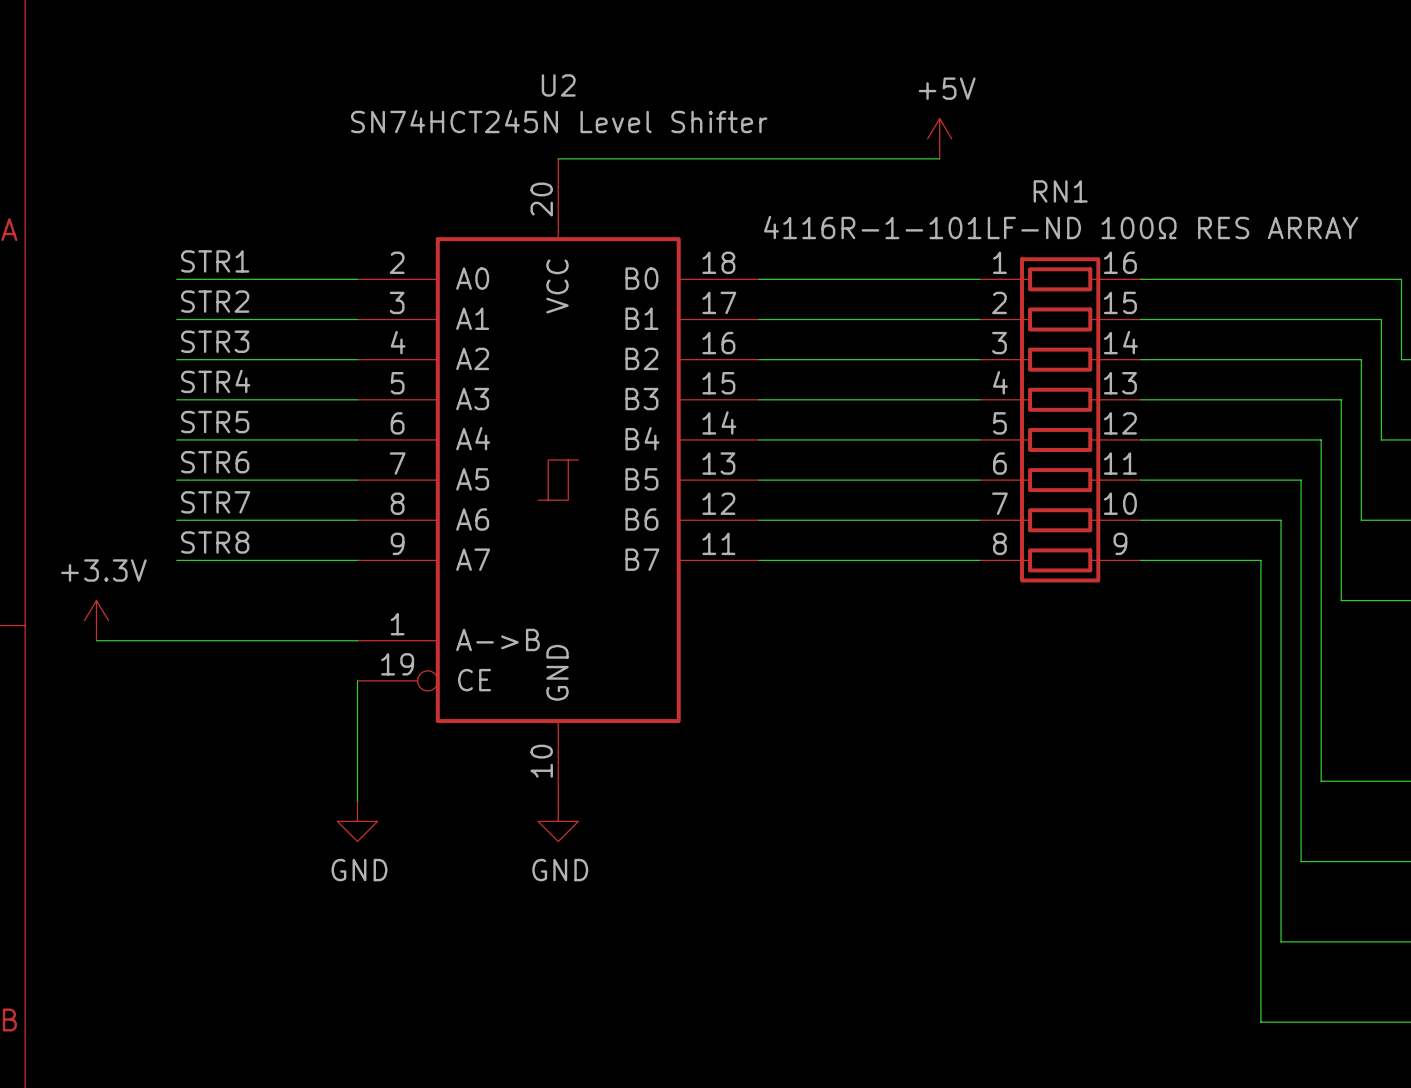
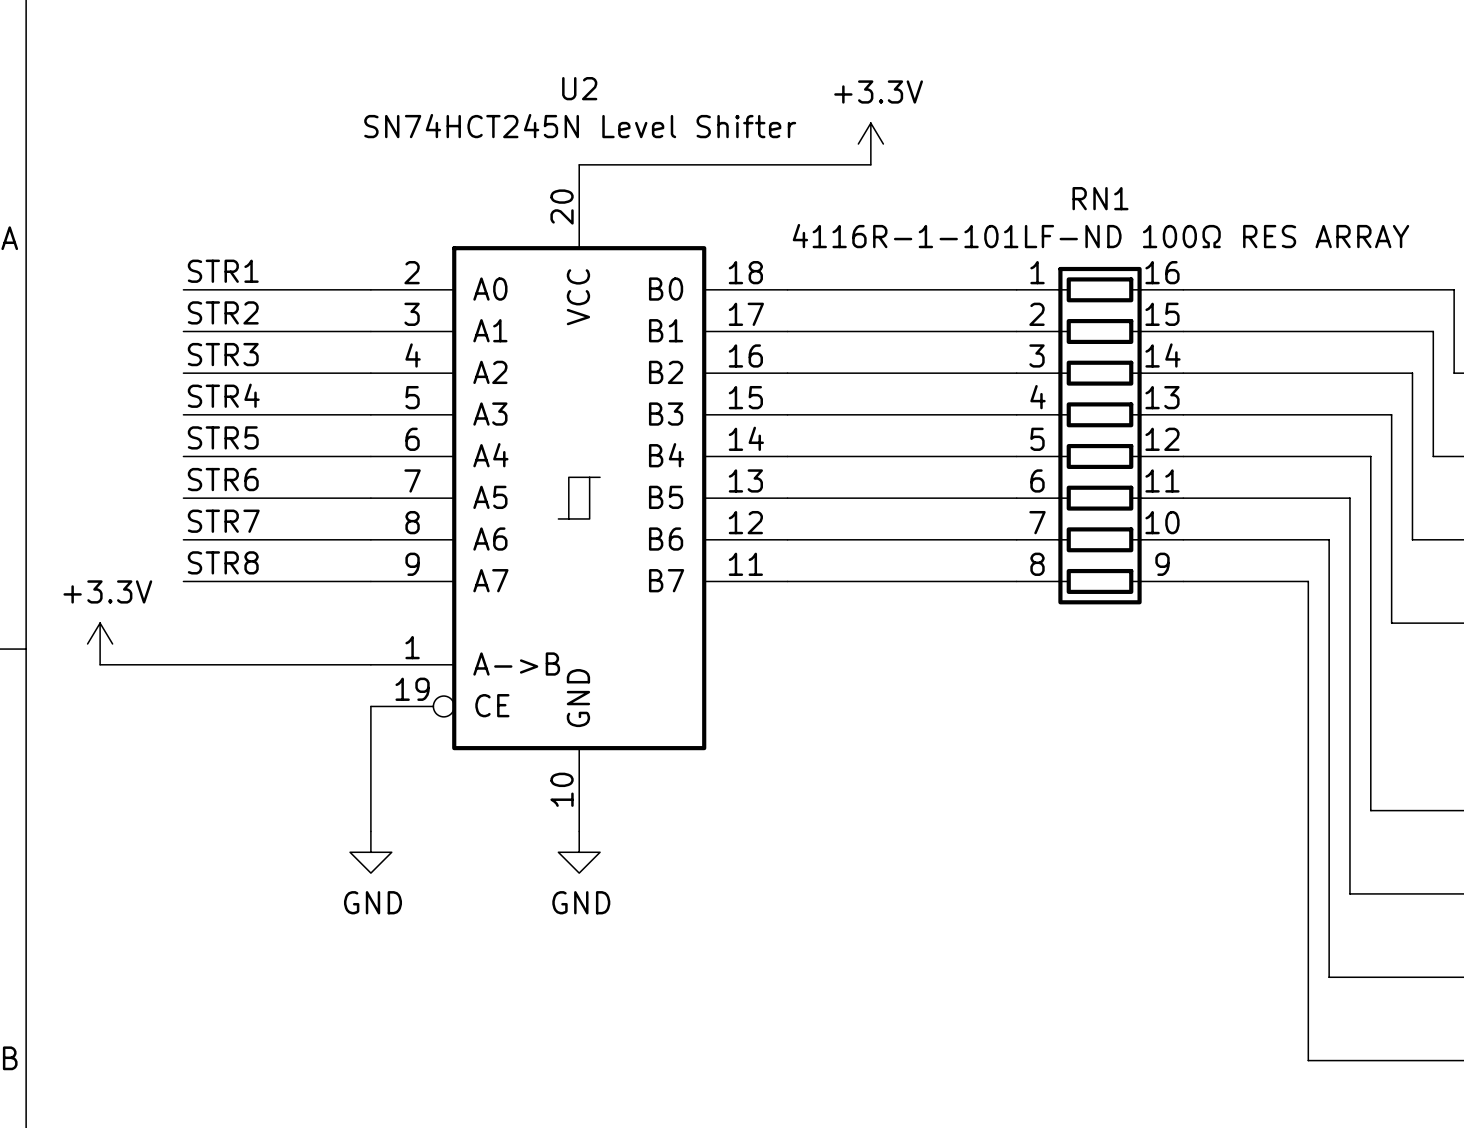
power symbol: none -> +3.3V (870, 144)
power symbol: +5V (939, 138) -> none
wire: (839, 158) (939, 158) -> none

